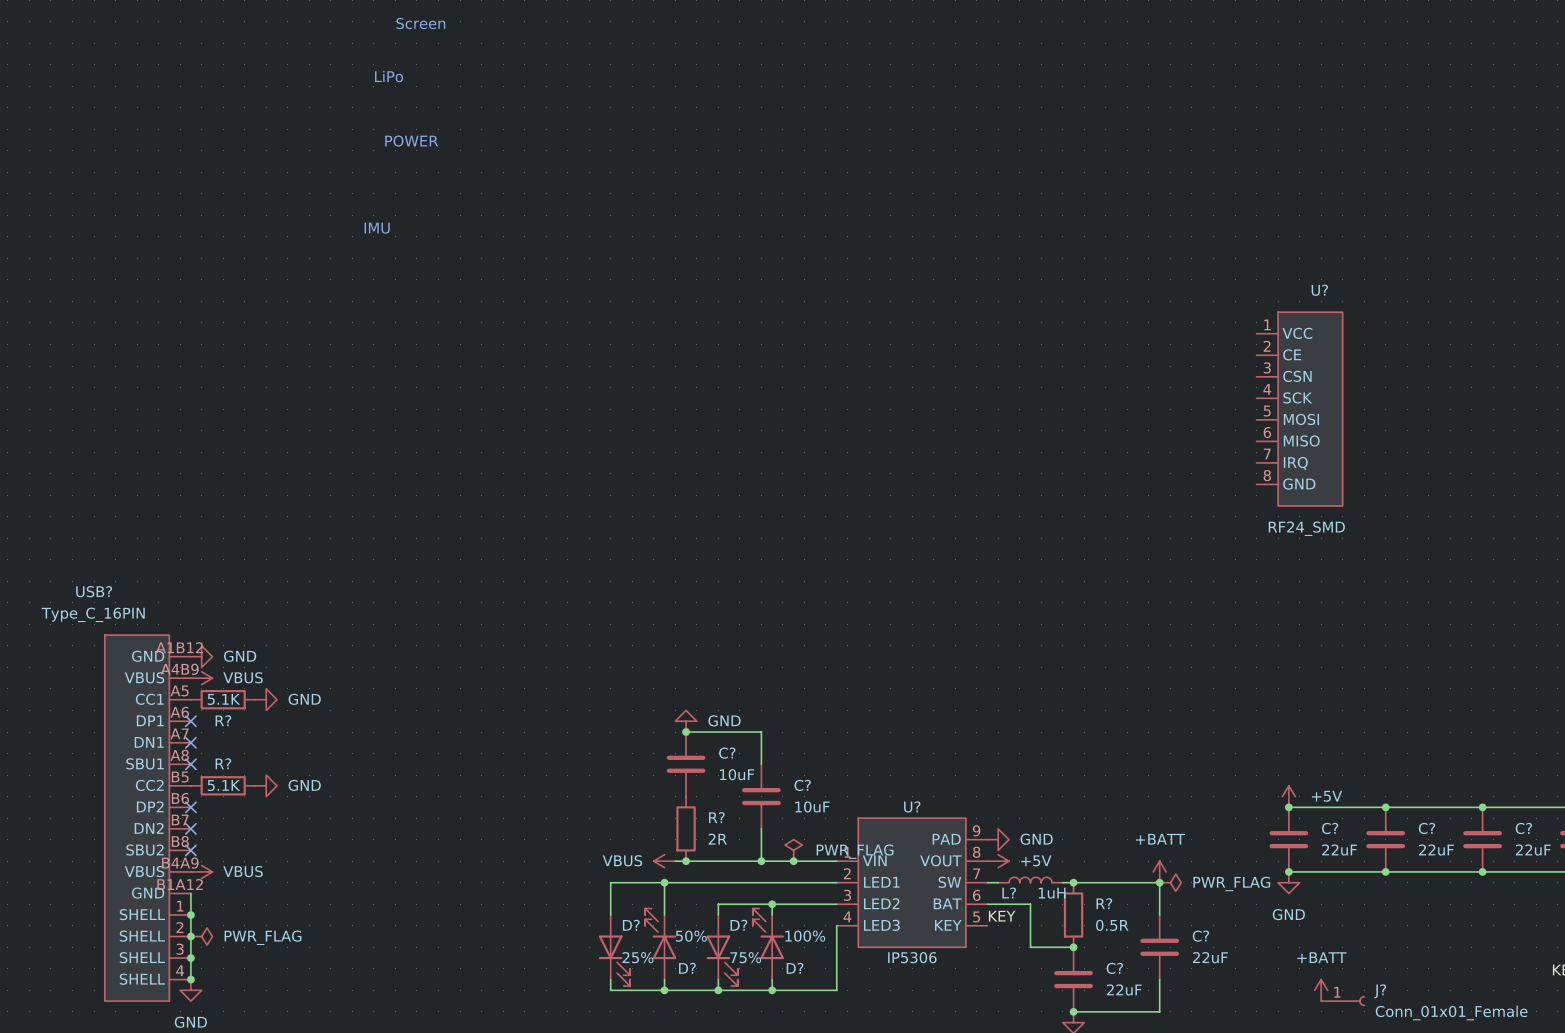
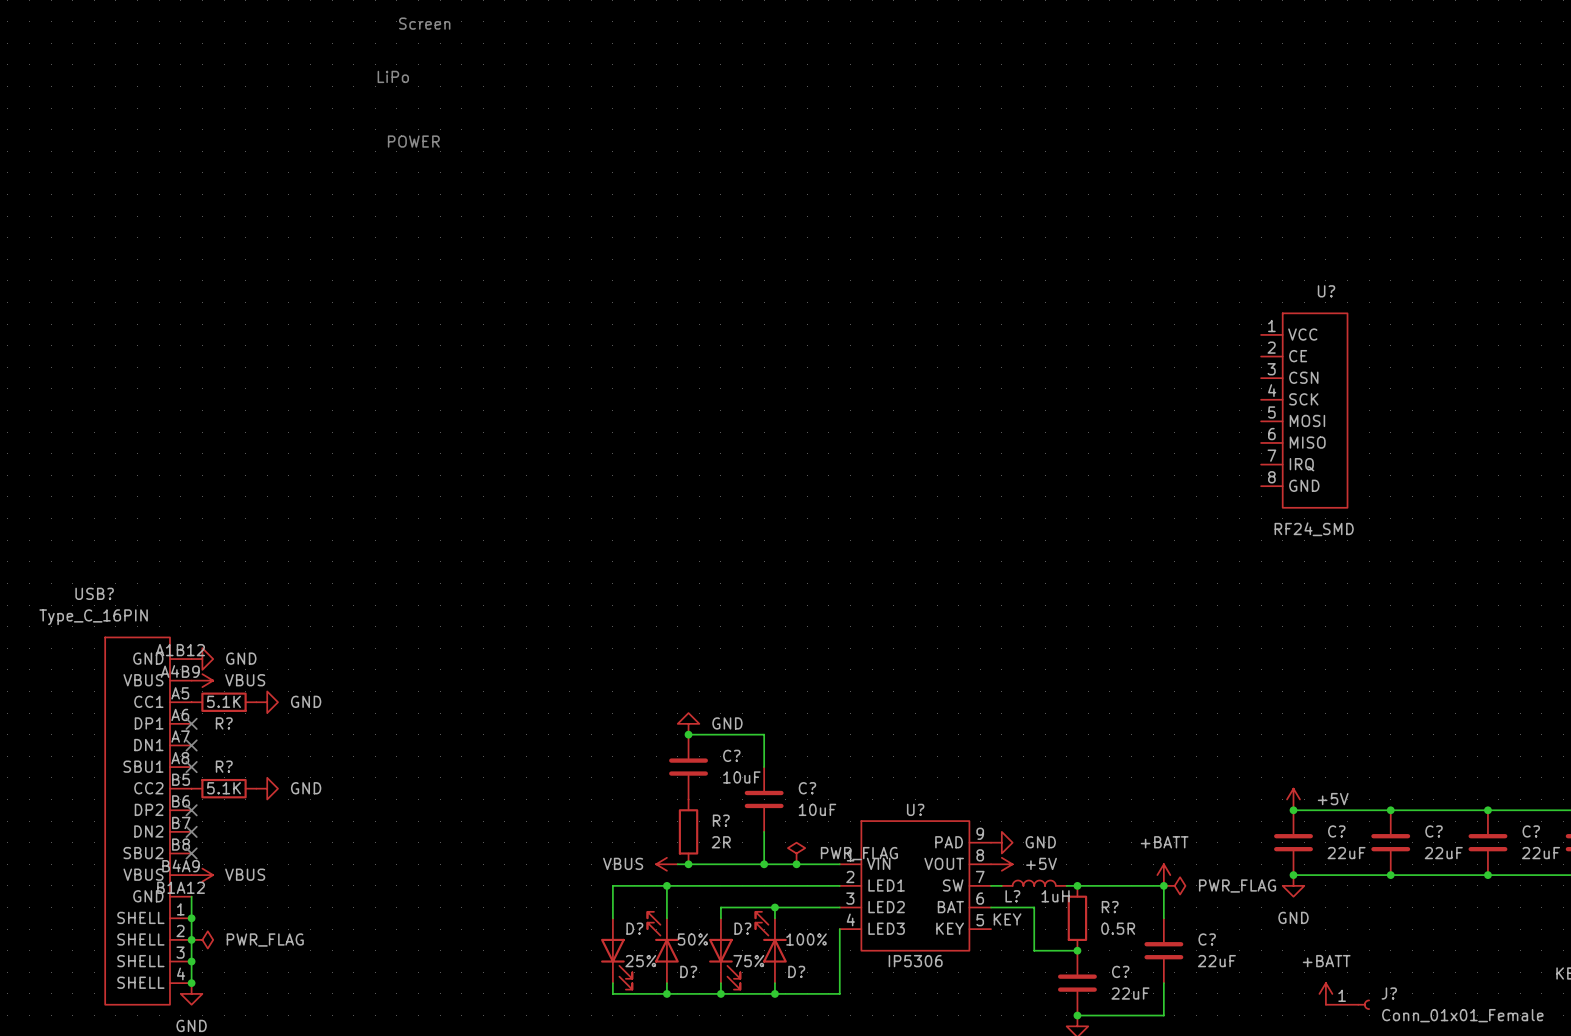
text: IMU (377, 228) -> none

